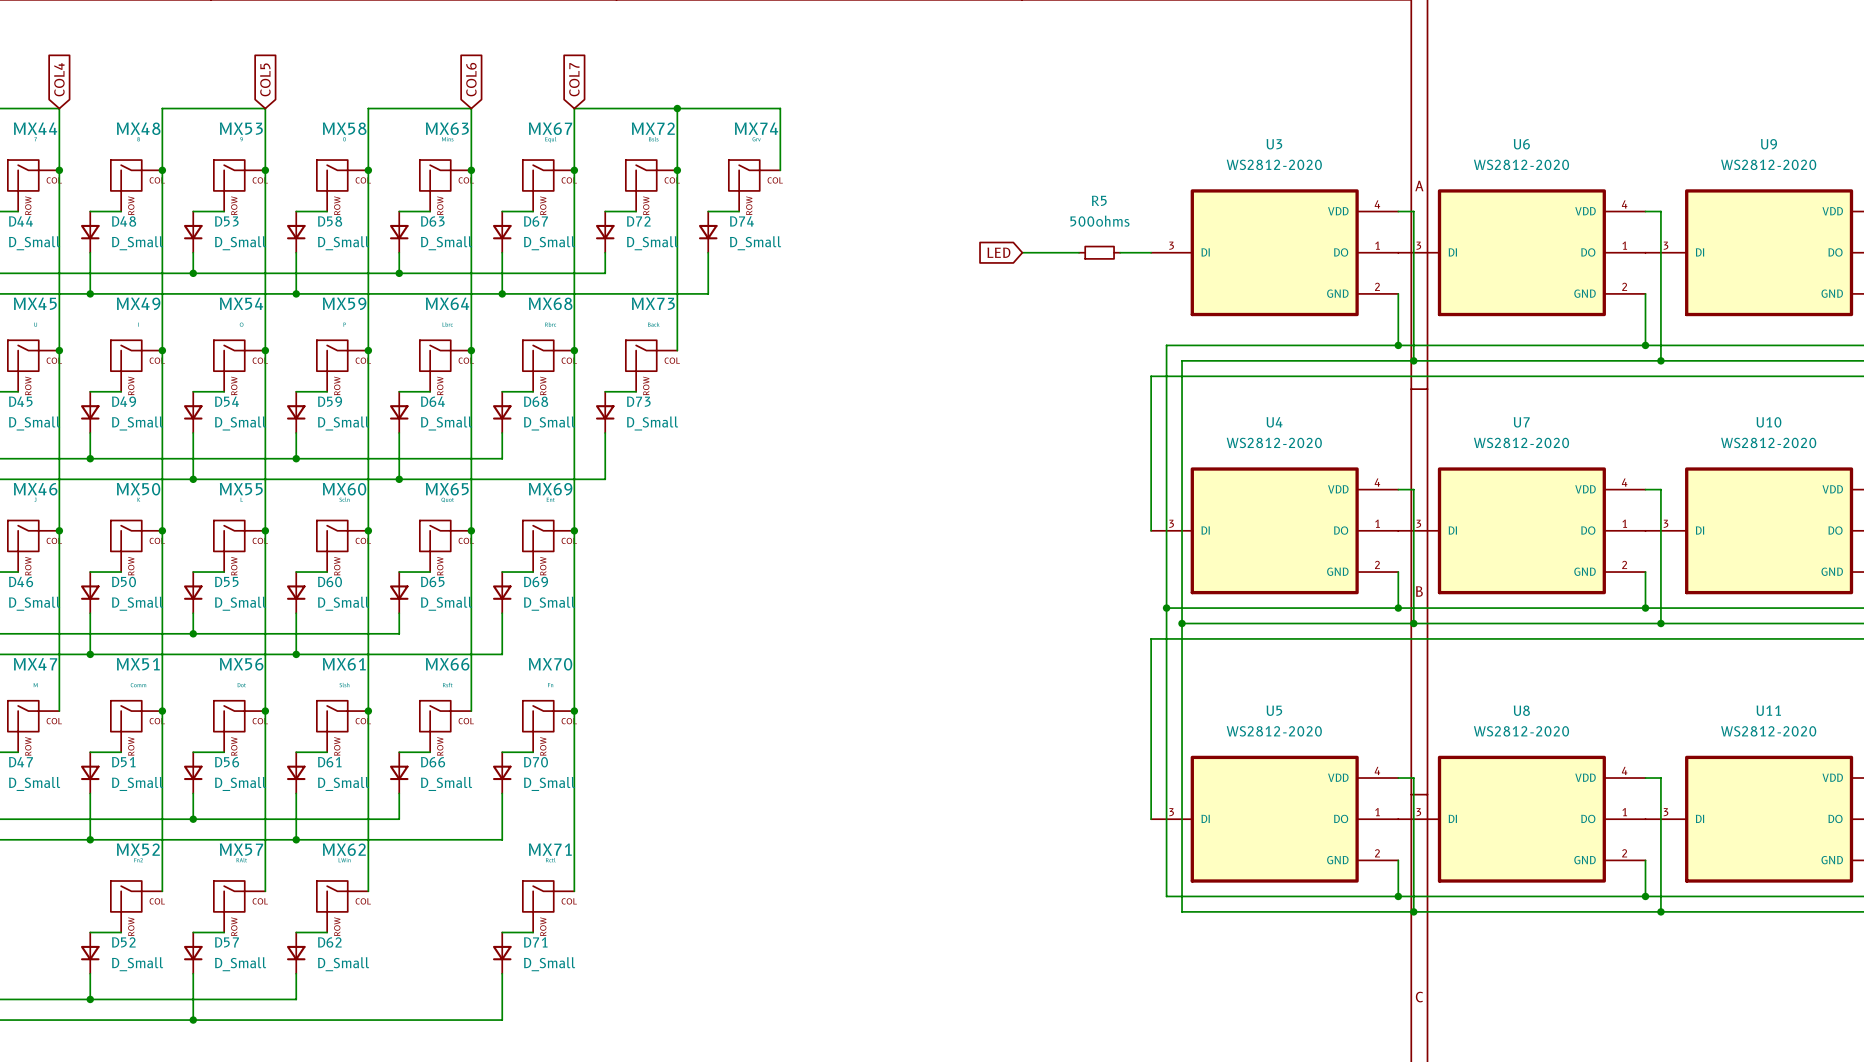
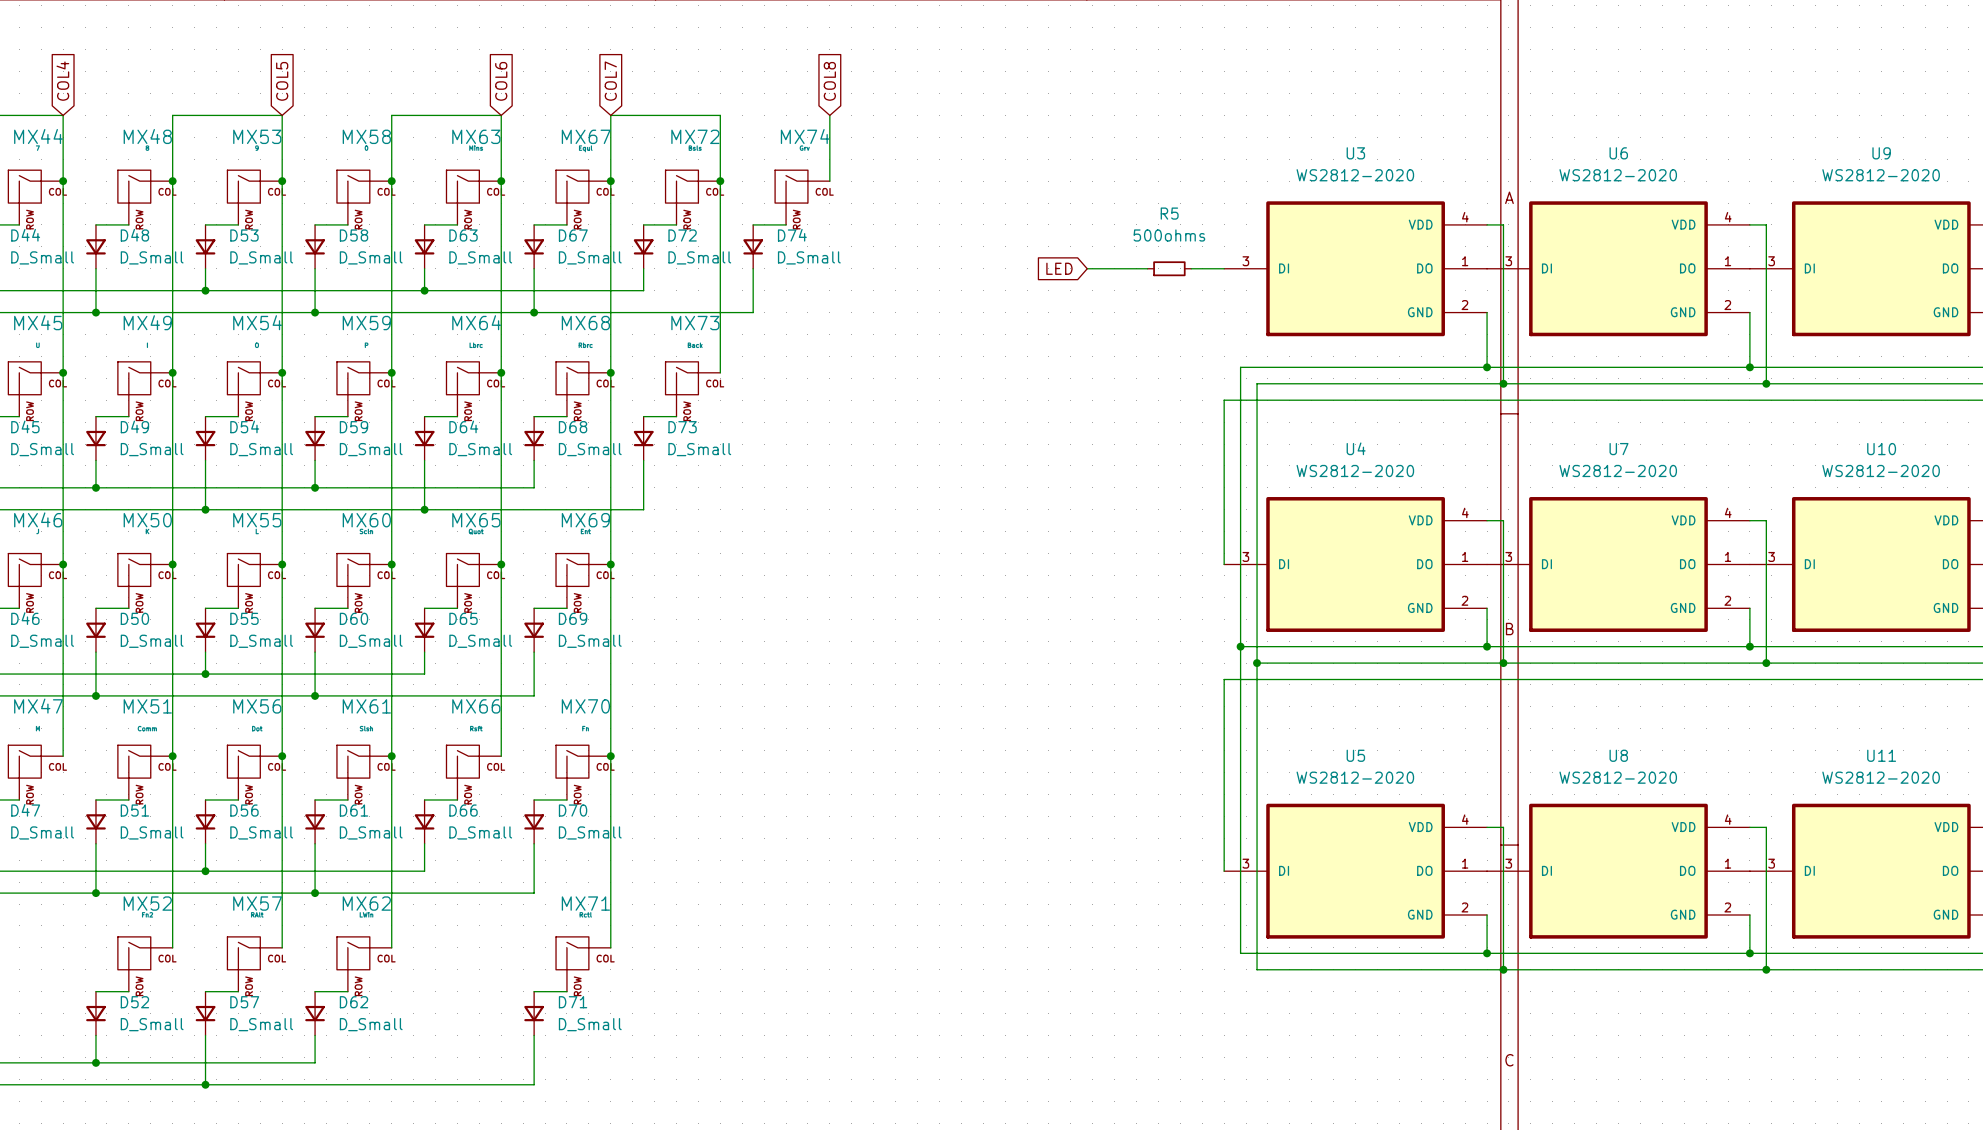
global label: none -> COL8 (829, 81)
wire: (677, 108) (780, 108) -> none
junction: (677, 108) -> none

